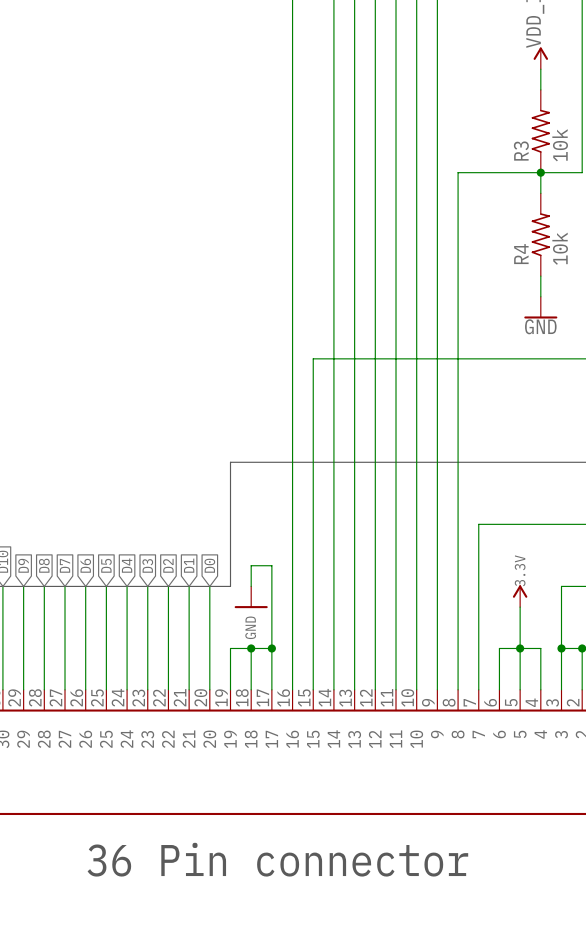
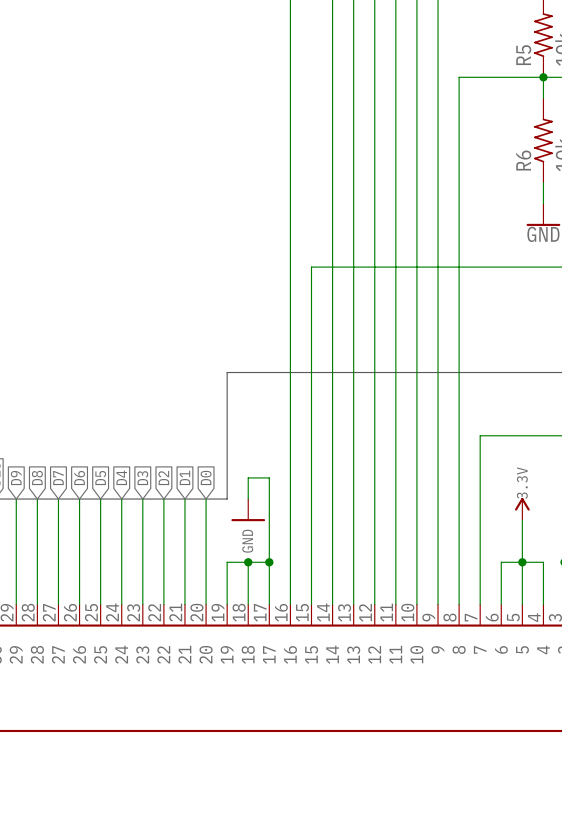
R3 name: R3 (521, 151) -> R5 (523, 55)
R4 name: R4 (521, 254) -> R6 (523, 160)
text: 36 Pin connector (277, 859) -> none

